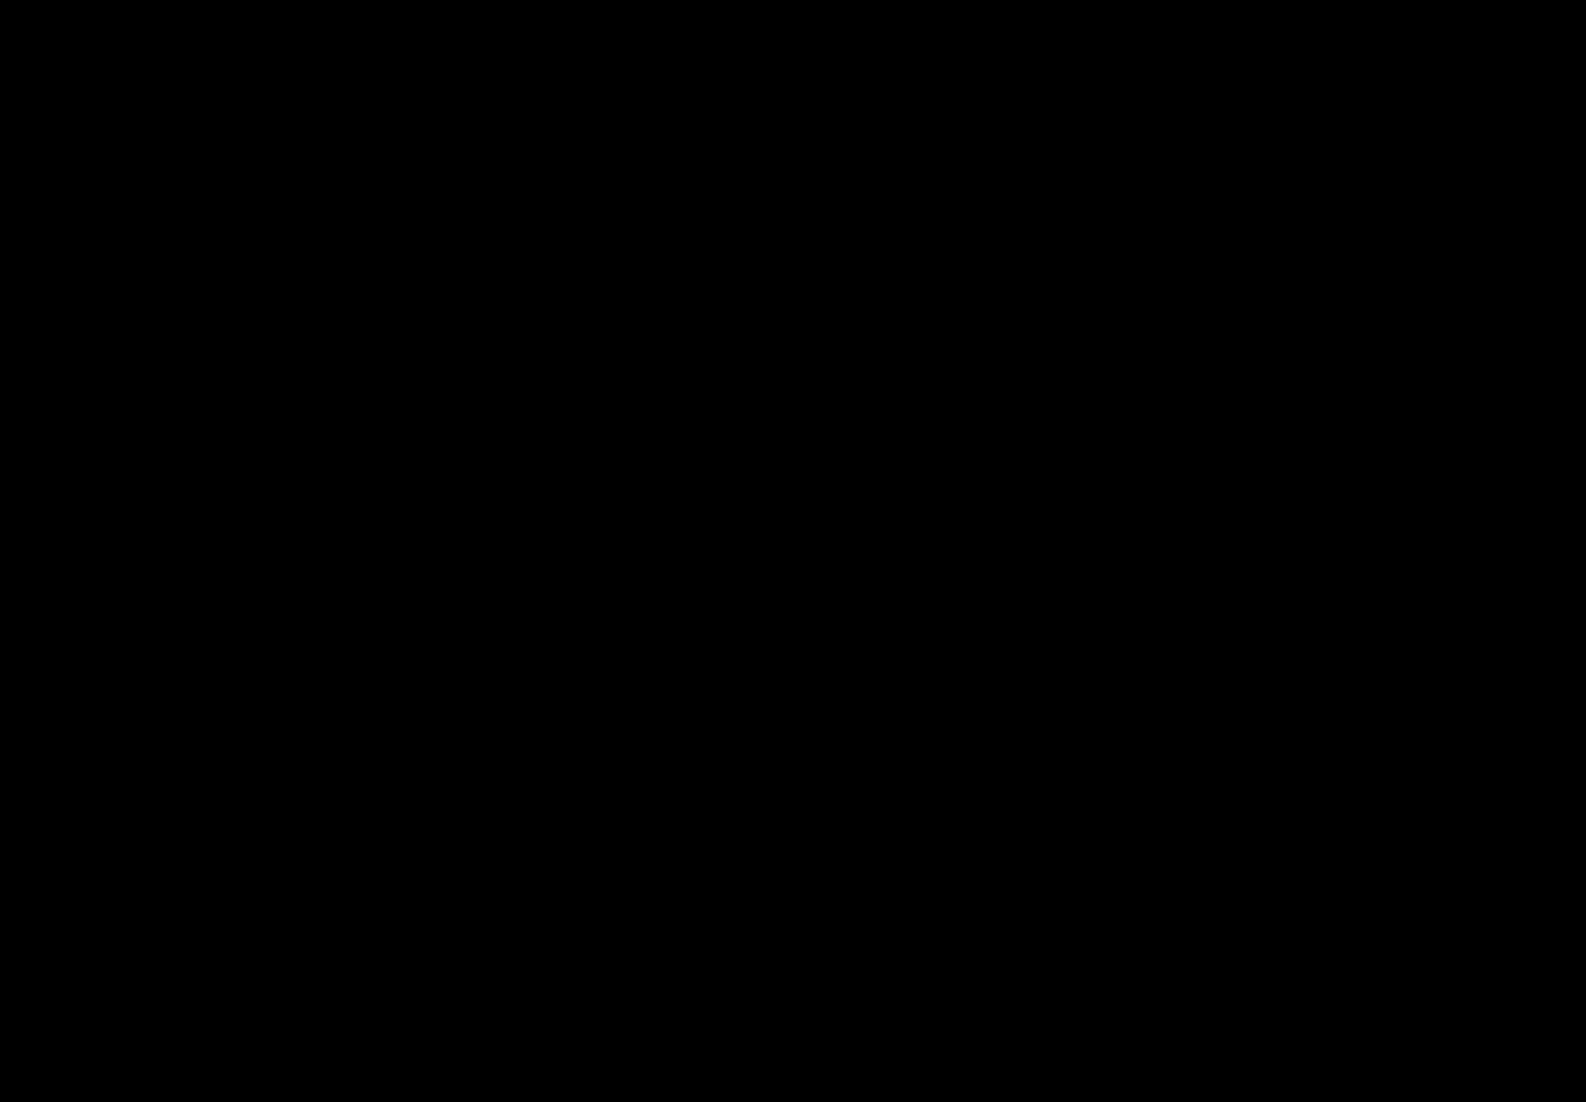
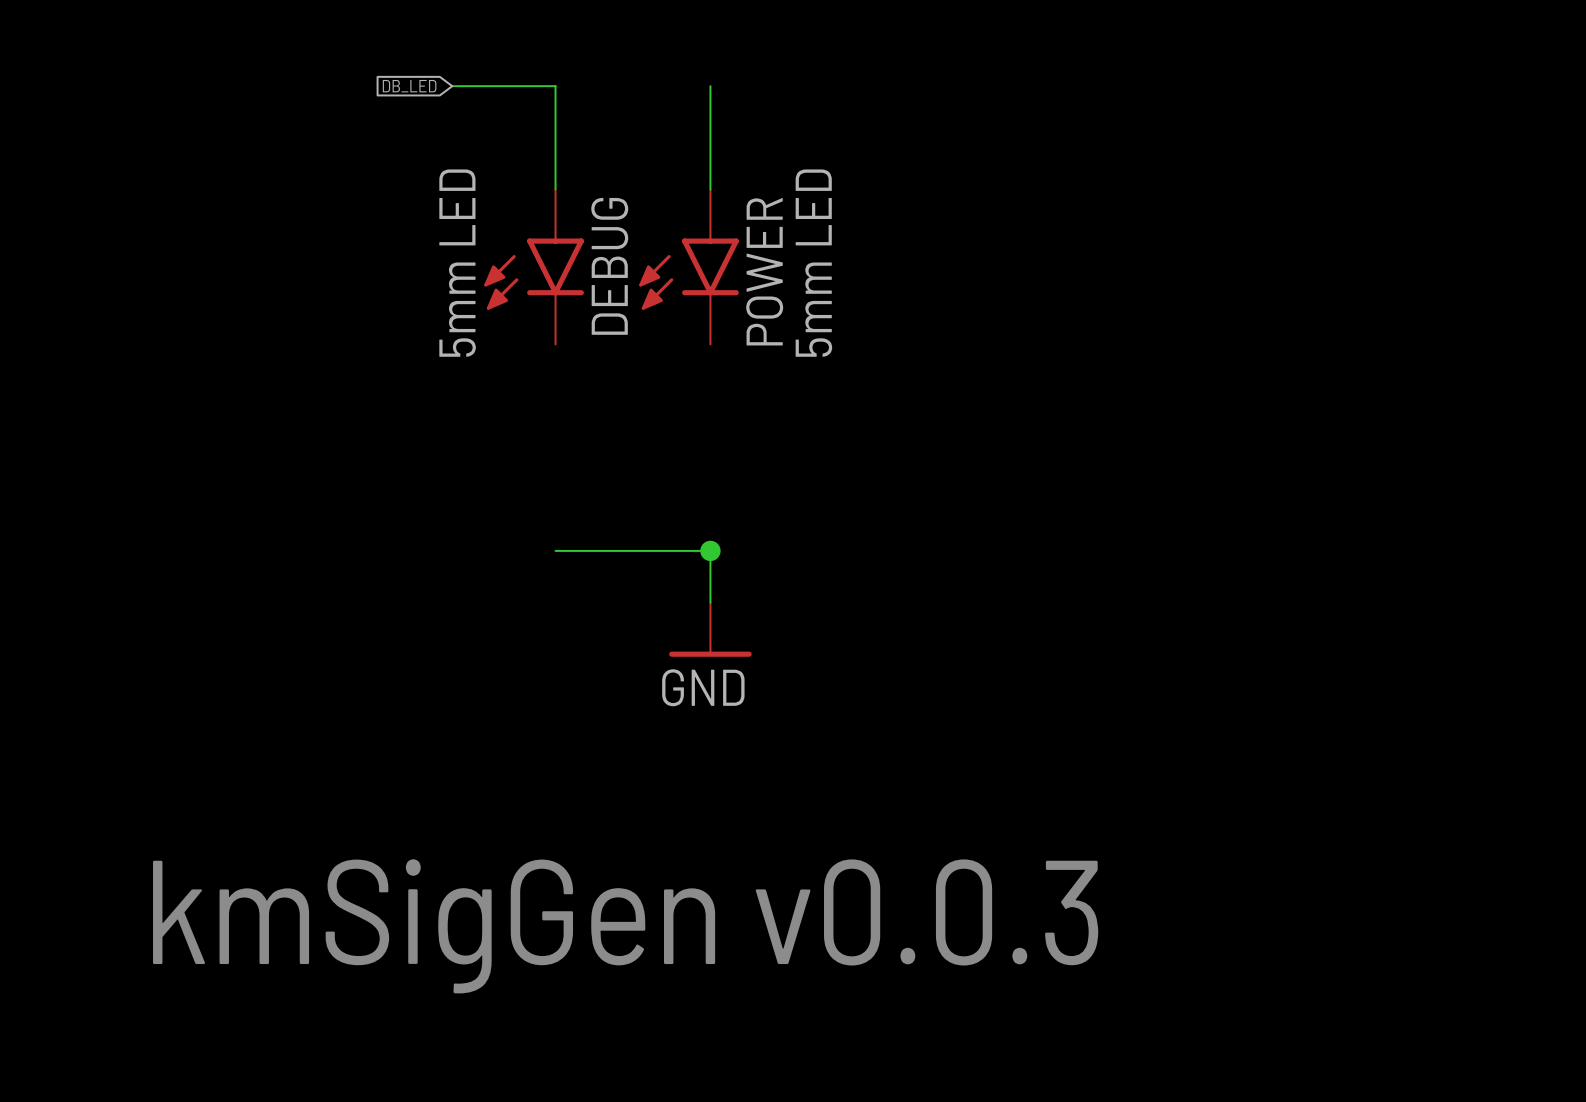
global label: none -> DB_LED (409, 86)
wire: none -> (452, 86) (555, 86) (555, 189)
wire: none -> (710, 86) (710, 189)
DEBUG: none -> 5mm LED (534, 266)
POWER: none -> 5mm LED (689, 266)
wire: none -> (555, 550) (710, 550) (710, 602)
junction: none -> (710, 550)
power symbol: none -> GND (710, 629)
text: none -> kmSigGen v0.0.3 (625, 926)

